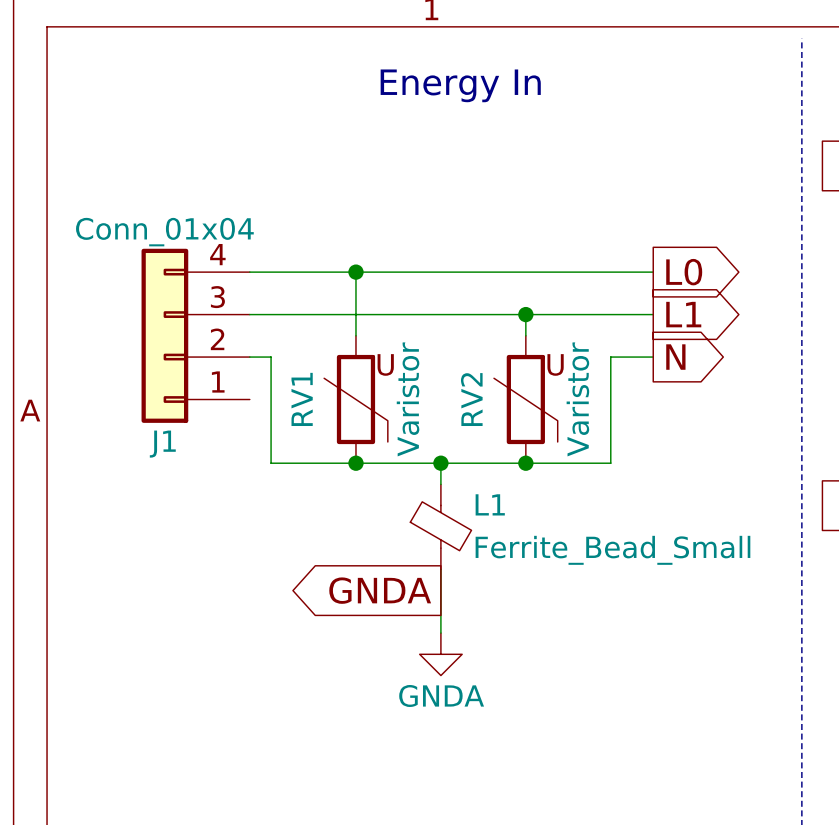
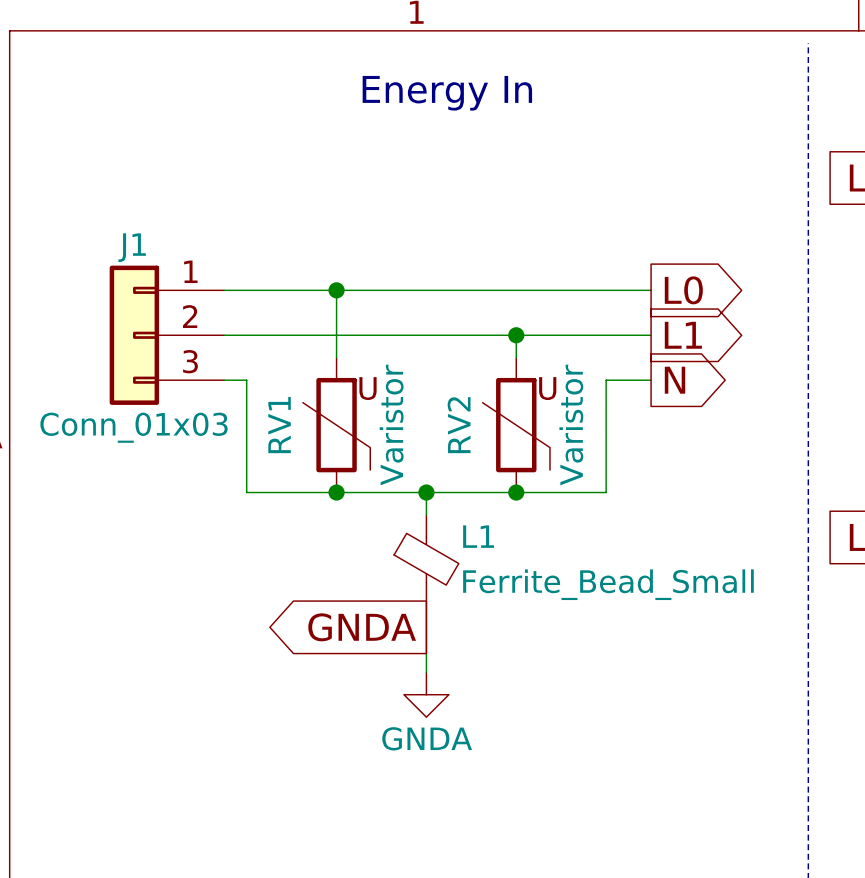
J1 value: Conn_01x04 (164, 232) -> Conn_01x03 (134, 427)
J1 symbol: [141, 248, 250, 423] -> [109, 265, 225, 405]
J1 name position: J1 (162, 444) -> J1 (132, 247)

